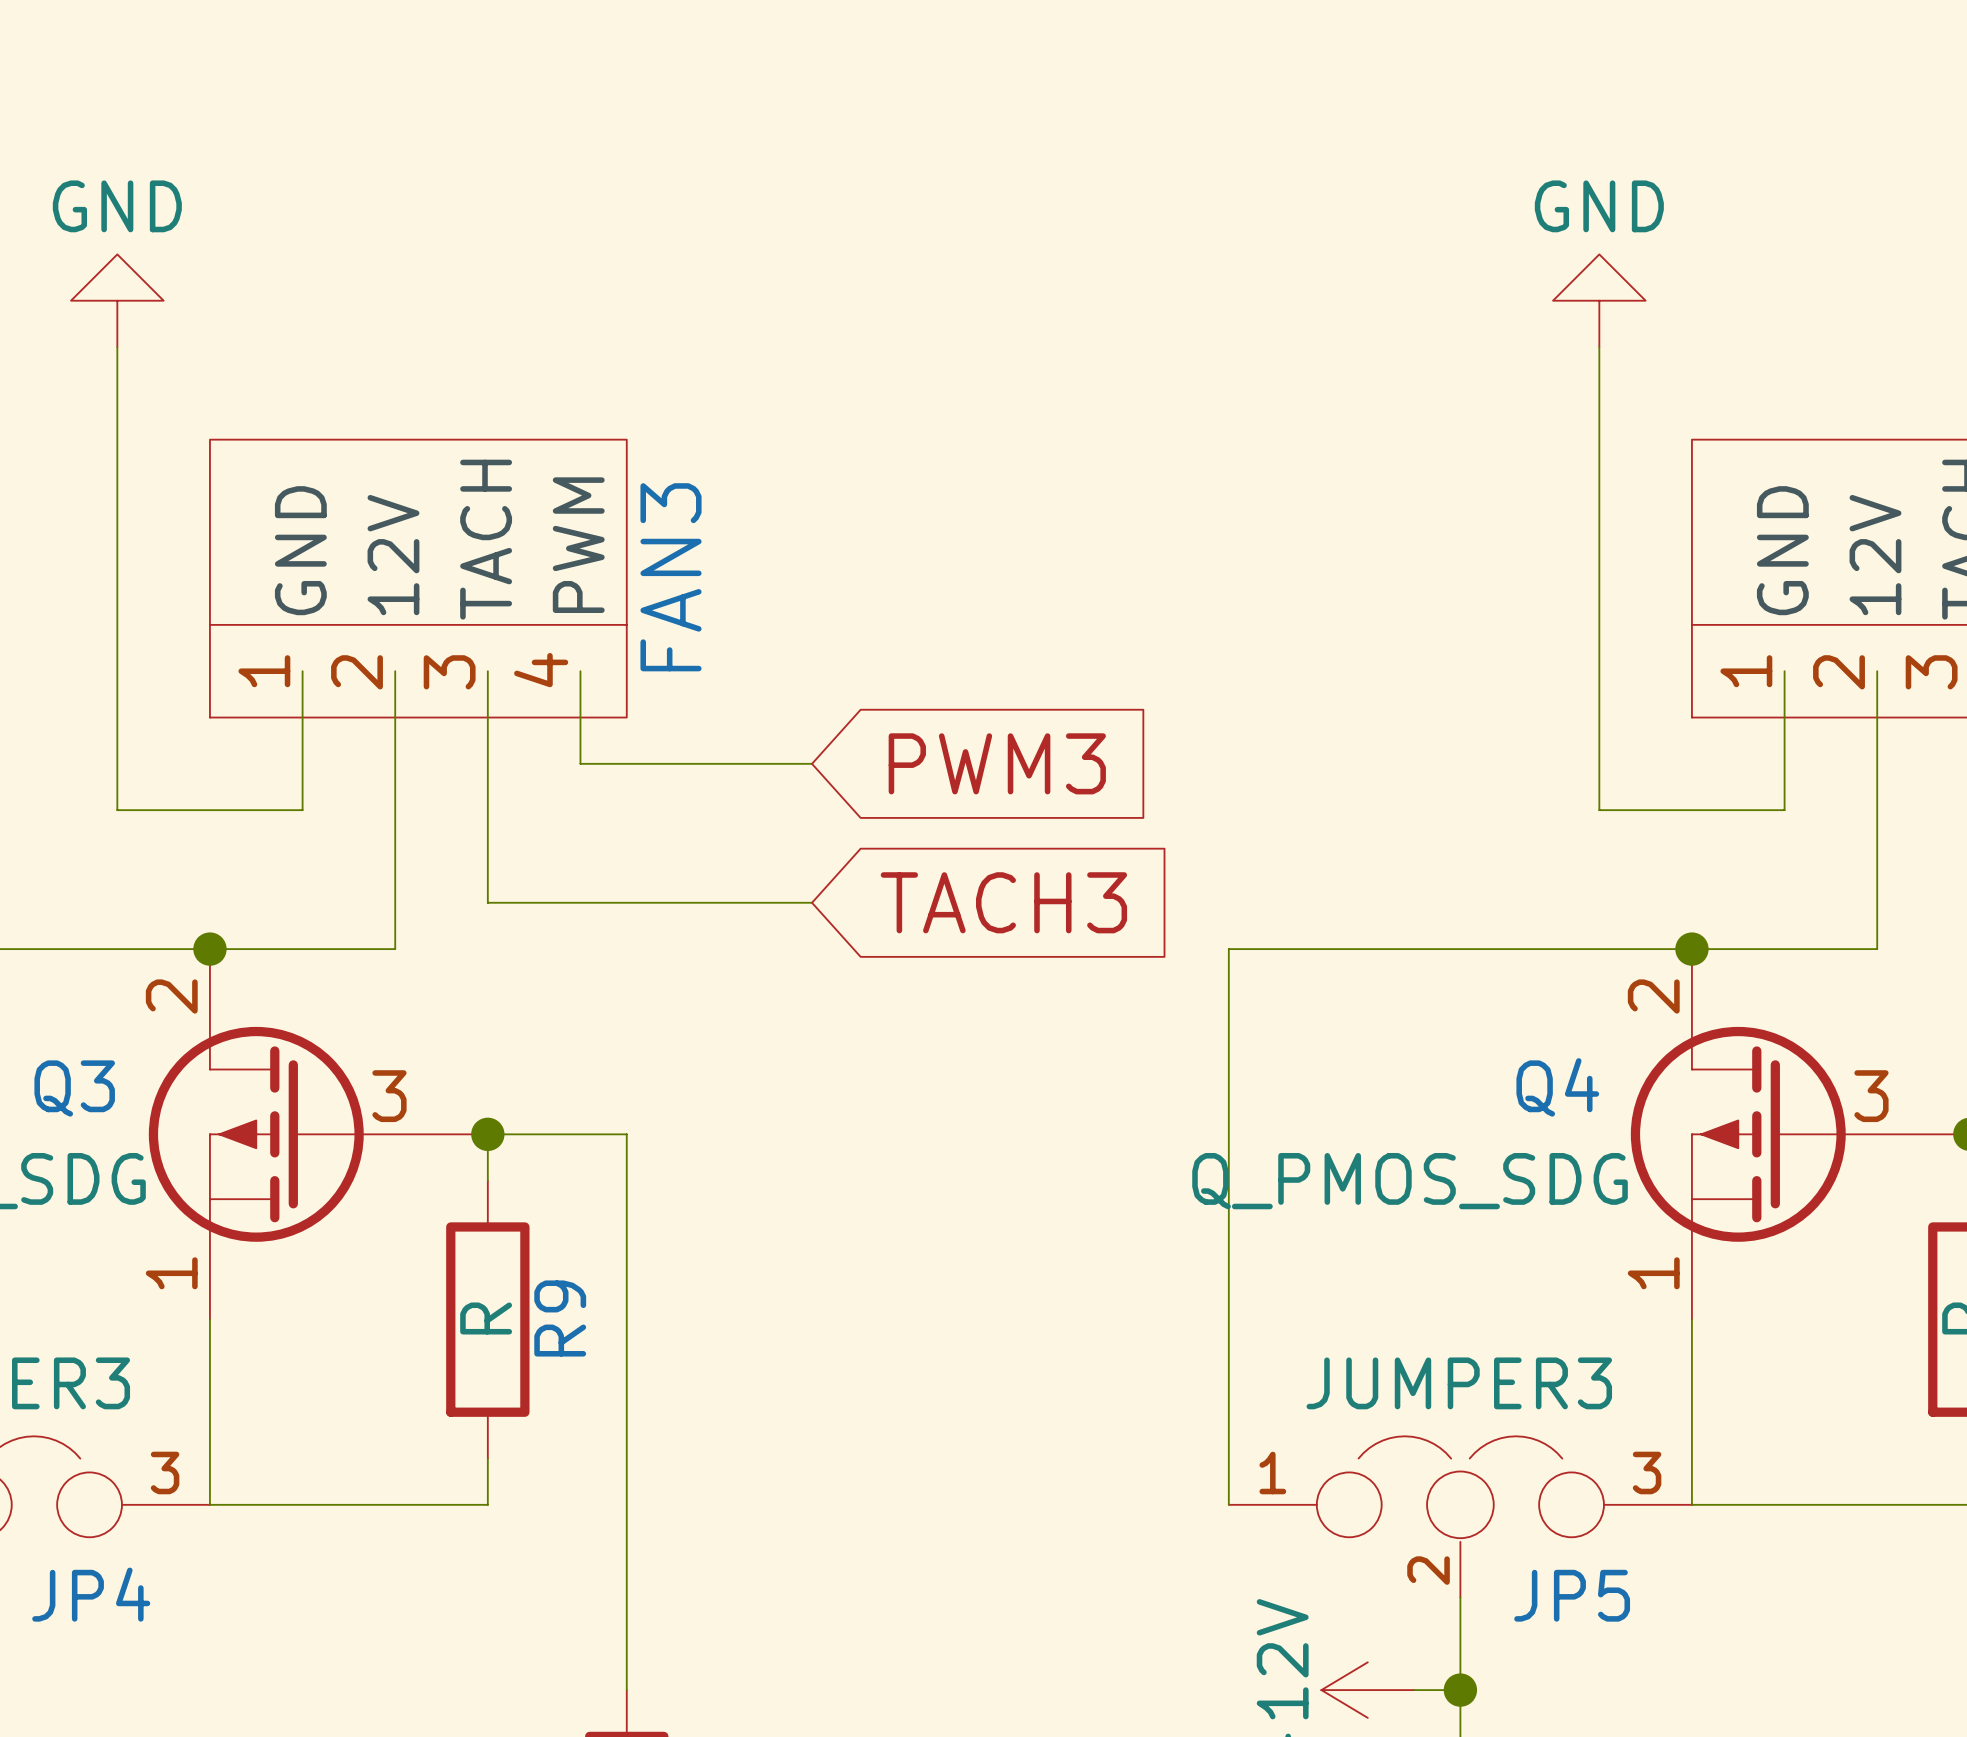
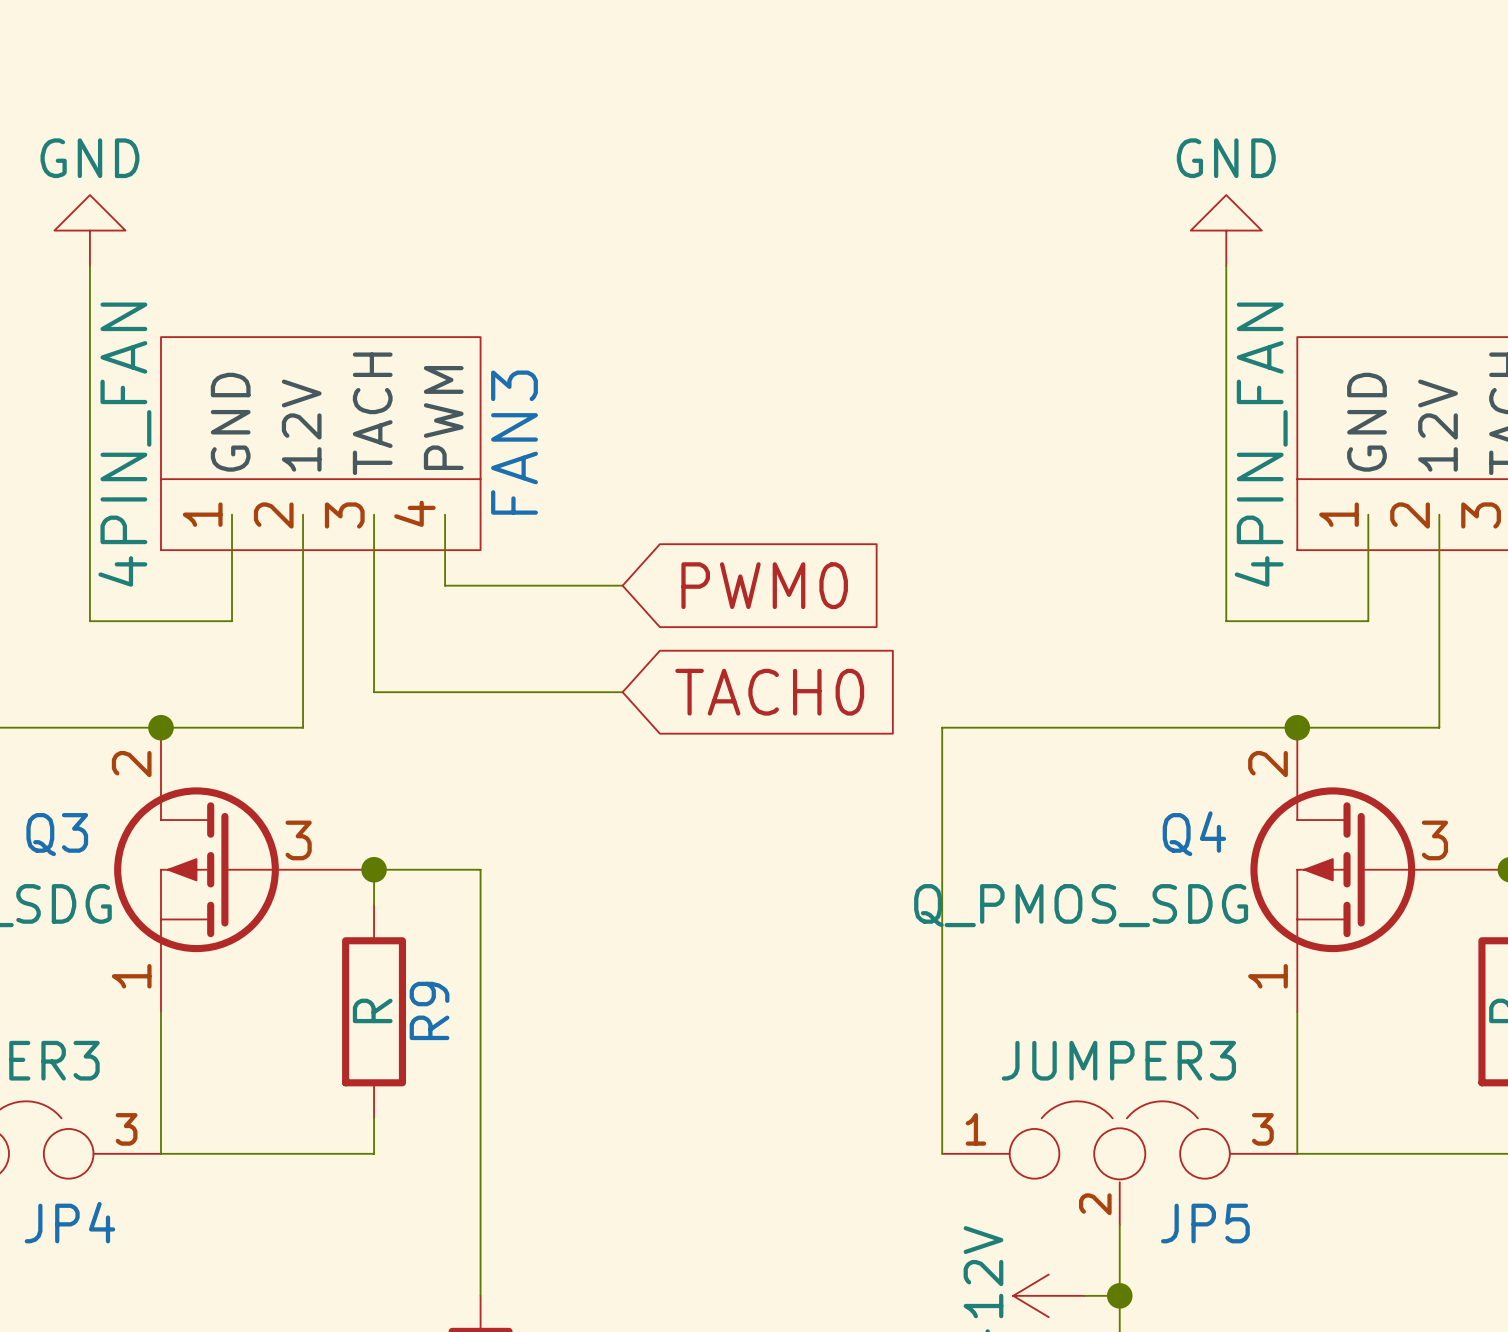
FAN3 value: none -> 4PIN_FAN (124, 444)
part value: none -> 4PIN_FAN (1261, 444)
global label: PWM3 (997, 763) -> PWM0 (764, 585)
global label: TACH3 (1003, 902) -> TACH0 (769, 692)

